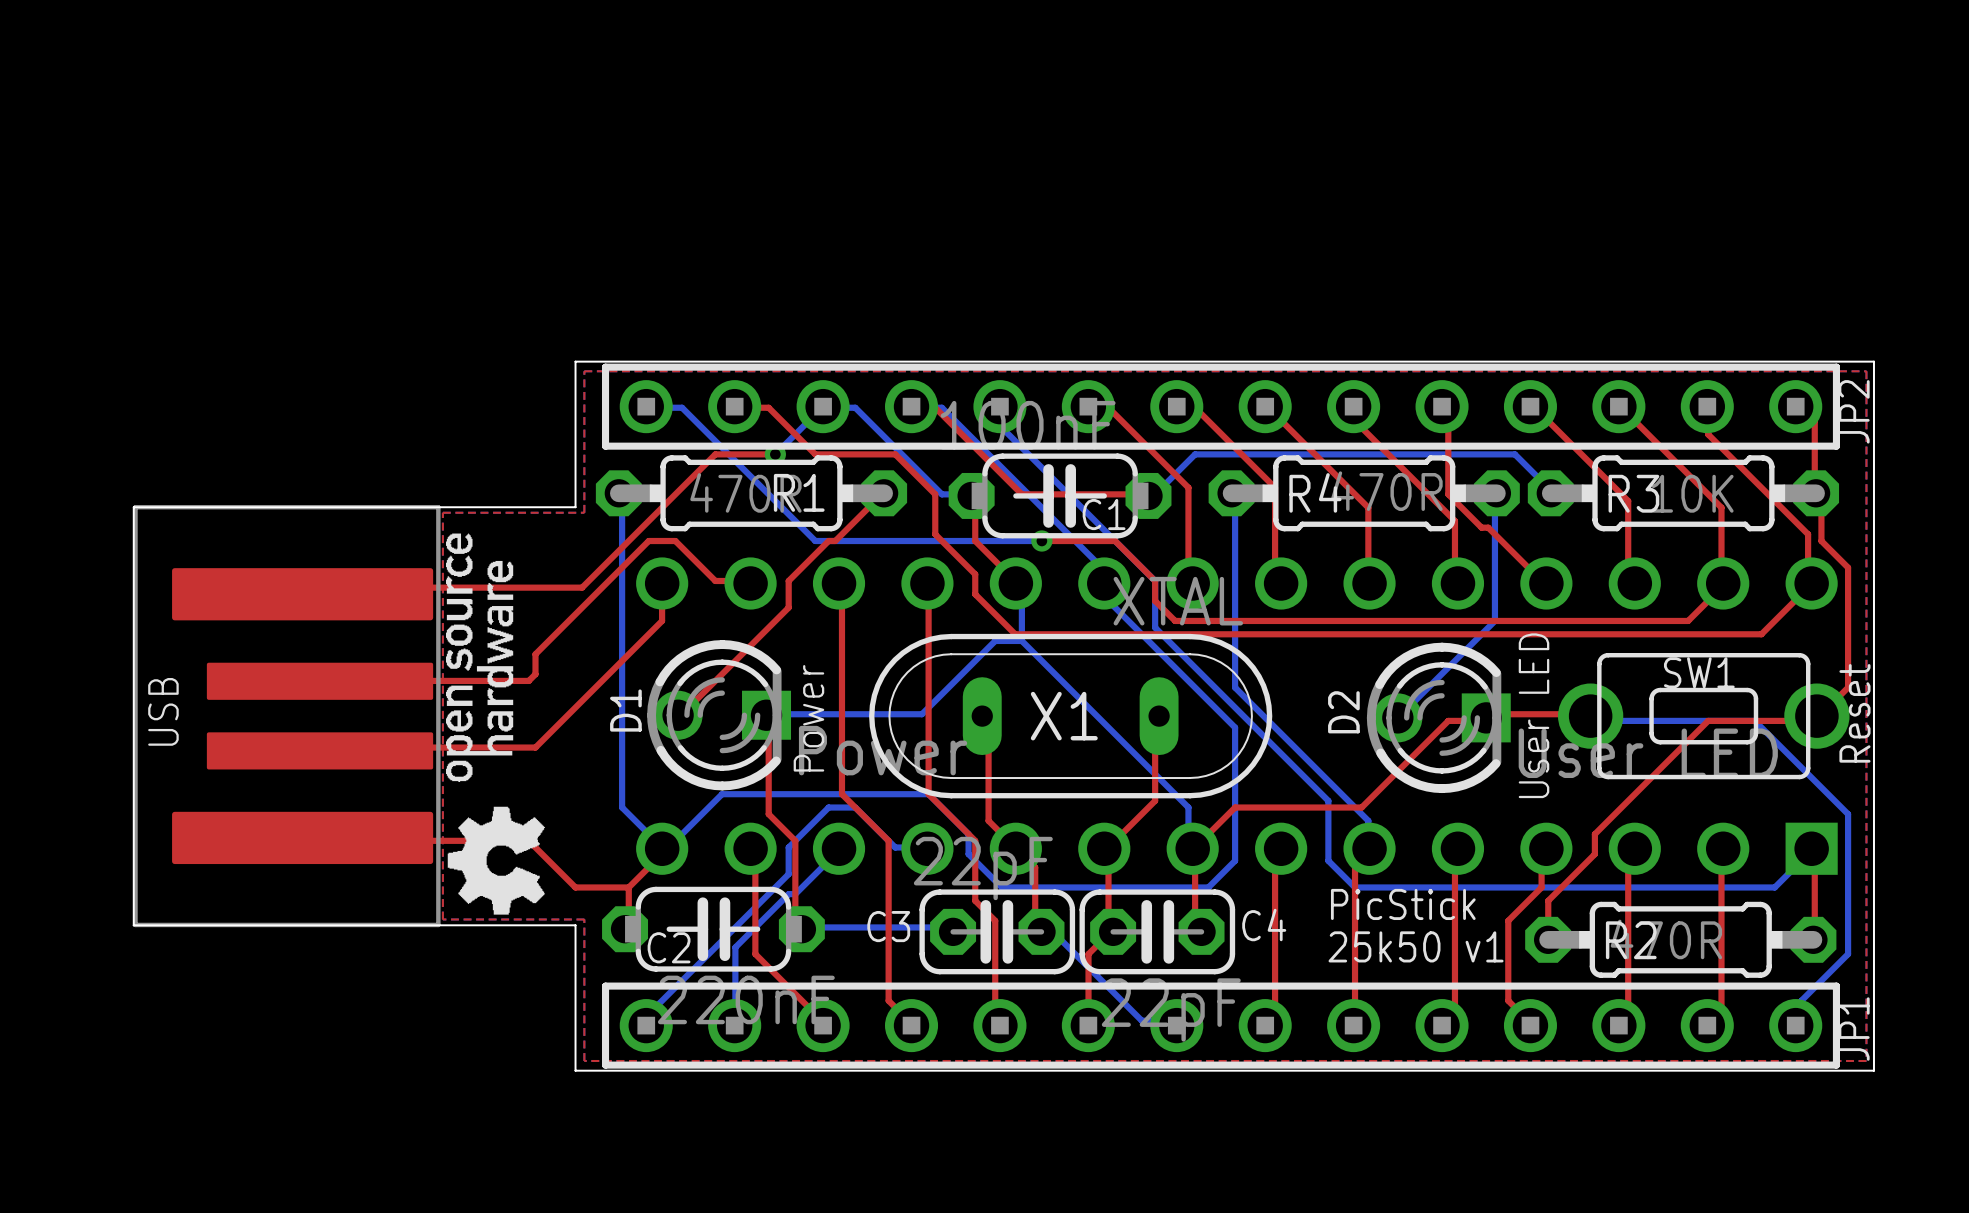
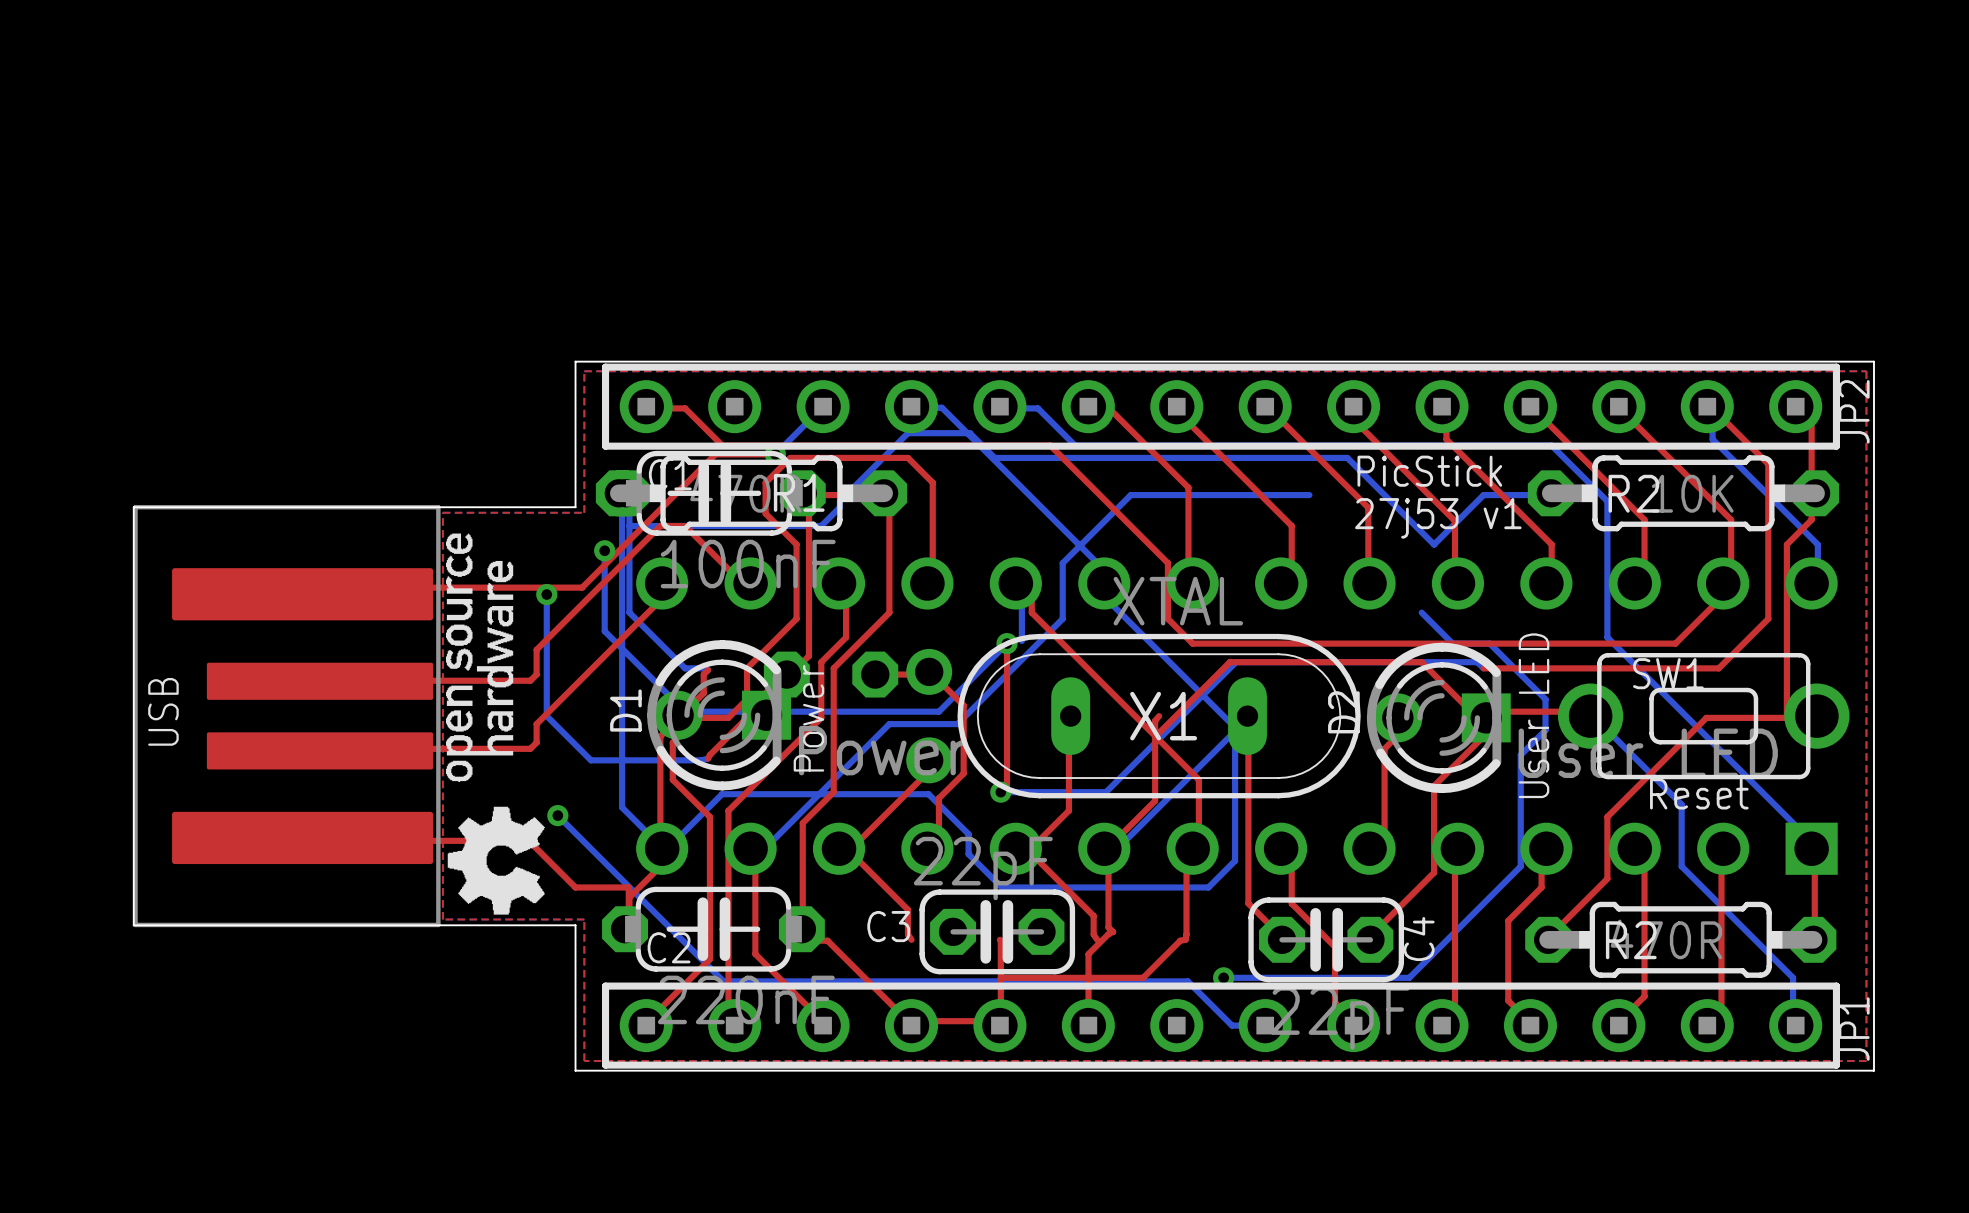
bottom track: (646, 406) (682, 407) (815, 541) (1041, 541) -> none
top track: (734, 406) (768, 407) (815, 454) (895, 454) (935, 494) (935, 534) (975, 574) (975, 594) (1015, 634) (1761, 634) (1811, 583) (1808, 580) (1808, 534) (1708, 434) (1707, 406) -> (1483, 668) (1718, 668) (1768, 618) (1768, 464) (1712, 408) (1707, 406)
bottom track: (823, 406) (855, 407) (941, 494) (971, 495) -> none
top track: (911, 406) (935, 407) (1021, 494) (1148, 494) (1148, 495) -> none
bottom track: (999, 406) (1001, 407) (1001, 427) (1155, 580) (1155, 627) (1328, 800) (1328, 860) (1355, 887) (1774, 887) (1811, 848) -> (999, 406) (1000, 408) (1037, 408) (1075, 445) (1551, 445) (1607, 501) (1607, 637) (1817, 847) (1822, 848)
top track: (1176, 406) (1195, 407) (1275, 487) (1275, 580) (1281, 583) -> (1176, 406) (1174, 408) (1291, 526) (1291, 583)
top track: (1442, 406) (1448, 407) (1448, 494) (1481, 527) (1488, 527) (1541, 580) (1546, 583) -> (1442, 406) (1446, 408) (1446, 439) (1551, 544) (1551, 581) (1556, 583)
top track: (1530, 406) (1534, 407) (1628, 501) (1628, 580) (1634, 583) -> (1530, 406) (1644, 519) (1645, 583)
top track: (1618, 406) (1721, 507) (1721, 580) (1723, 583) (1721, 587) (1688, 620) (1175, 620) (1155, 600) (1155, 580) (1115, 541) (1041, 541) -> (1618, 406) (1731, 519) (1731, 581) (1733, 583) (1675, 643) (1192, 643) (1167, 618) (1167, 563) (1050, 445) (722, 445) (685, 408) (648, 408) (646, 406)
bottom track: none -> (1707, 406) (1712, 408) (1712, 439) (1817, 544) (1817, 581) (1822, 583)
top track: (1795, 406) (1801, 407) (1814, 421) (1814, 487) (1816, 493) (1821, 494) (1821, 541) (1848, 567) (1848, 687) (1821, 714) (1816, 716) (1814, 720) (1708, 720) (1594, 834) (1594, 854) (1548, 900) (1548, 939) -> (1795, 406) (1811, 420) (1811, 488) (1816, 493) (1811, 495) (1811, 519) (1786, 544) (1786, 717) (1816, 716) (1811, 717) (1706, 717) (1607, 816) (1607, 878) (1548, 939)
bottom track: none -> (625, 493) (629, 495) (629, 612) (685, 668) (708, 670)
top track: (884, 493) (835, 541) (828, 541) (788, 580) (788, 607) (682, 714) (678, 715) -> none
bottom track: (1231, 493) (1235, 494) (1235, 687) (1368, 820) (1369, 848) -> none
R4: 470R (1364, 493) -> none
bottom track: (1496, 493) (1494, 494) (1494, 620) (1397, 717) -> none
bottom track: (1550, 493) (1548, 487) (1514, 454) (1195, 454) (1155, 494) (1148, 495) -> (1550, 493) (1545, 495) (1483, 495) (1434, 544) (1347, 457) (994, 457) (969, 433) (907, 433) (839, 501) (839, 507) (821, 526) (629, 526)
R3 name: R3 (1633, 493) -> R2 (1633, 493)
top track: (971, 495) (975, 501) (975, 541) (1015, 583) -> none
C1 rotation: 0° (1060, 495) -> 180° (714, 493)
C1 position: (1060, 495) -> (714, 493)
bottom track: none -> (1309, 495) (1130, 495) (1062, 563) (1062, 618) (957, 724) (889, 724) (765, 847) (761, 848)
text: none -> 27j53 v1 (1438, 518)
via position: (1041, 541) -> (1007, 643)
bottom track: none -> (604, 550) (604, 631) (672, 699) (672, 705) (678, 711) (938, 711) (1007, 643)
via: none -> (604, 550)
top track: (662, 583) (662, 620) (535, 747) (322, 747) (320, 750) -> (672, 583) (672, 587) (536, 724) (536, 742) (530, 748) (326, 748) (320, 750)
top track: (750, 583) (748, 580) (715, 580) (675, 541) (648, 541) (535, 654) (535, 674) (528, 680) (320, 681) -> (761, 583) (759, 581) (740, 581) (685, 526) (660, 526) (536, 649) (536, 674) (530, 680) (320, 681)
top track: (839, 583) (841, 587) (841, 794) (888, 840) (888, 1000) (911, 1025) -> none
top track: none -> (849, 583) (846, 587) (846, 637) (821, 662) (821, 717) (728, 810) (728, 1014) (734, 1021) (734, 1025)
top track: (927, 583) (928, 794) (975, 840) (975, 900) (995, 920) (995, 1020) (999, 1025) -> none
top track: none -> (938, 583) (932, 581) (932, 482) (907, 457) (790, 457) (765, 482) (765, 513) (796, 544) (796, 618) (747, 668) (747, 699) (728, 717) (697, 717) (672, 742) (672, 779) (709, 816) (709, 959) (648, 1021) (646, 1025)
top track: none -> (1026, 583) (1031, 587) (1031, 612) (1198, 779) (1198, 847) (1203, 848) (1186, 866) (1185, 939) (1180, 940) (1143, 977) (1000, 977)
bottom track: none -> (546, 594) (546, 716) (590, 760) (701, 760) (708, 758)
via: none -> (546, 594)
bottom track: none -> (1421, 612) (1452, 643) (1489, 643) (1545, 699) (1545, 730) (1520, 755) (1520, 866) (1409, 977) (1223, 977)
top track: none -> (1007, 643) (1007, 785) (1000, 792)
bottom track: none -> (1483, 668) (1477, 662) (1236, 662) (1106, 792) (1000, 792)
top track: none -> (708, 670) (703, 674) (703, 693) (660, 736) (660, 835) (672, 847) (672, 854) (629, 897) (629, 934) (625, 938)
text position: SW1 (1699, 672) -> SW1 (1668, 673)
part: none -> (831, 674)
top track: none -> (875, 674) (926, 674) (929, 671) (963, 705) (963, 773) (938, 798) (938, 848)
text rotation: 0° (1854, 713) -> 90° clockwise (1699, 793)
text position: Reset (1854, 713) -> Reset (1699, 793)
top track: (766, 715) (768, 720) (768, 814) (795, 840) (795, 927) (801, 929) -> none
bottom track: (766, 715) (921, 714) (995, 640) (1021, 640) (1188, 807) (1188, 847) (1192, 848) -> none
part: none -> (929, 716)
top track: (982, 716) (988, 720) (988, 820) (1035, 867) (1035, 927) (1041, 931) -> none
X1 name position: X1 (1064, 716) -> X1 (1163, 716)
top track: none -> (1070, 716) (1068, 717) (1068, 810) (1031, 847) (1026, 848) (1093, 915) (1093, 934) (1097, 939)
X1 position: (1070, 716) -> (1159, 716)
top track: none -> (1247, 716) (1248, 903) (1279, 934) (1282, 939)
bottom track: none -> (1247, 716) (1248, 717) (1118, 847) (1114, 848)
top track: none -> (1415, 716) (1384, 748) (1384, 847) (1380, 848)
top track: (1590, 716) (1588, 714) (1488, 714) (1481, 720) (1448, 720) (1361, 807) (1235, 807) (1192, 848) (1195, 854) (1195, 927) (1201, 931) -> (1590, 716) (1588, 711) (1508, 711) (1434, 785) (1434, 872) (1372, 934) (1370, 939)
bottom track: (1590, 716) (1594, 720) (1754, 720) (1848, 814) (1848, 954) (1801, 1000) (1801, 1020) (1795, 1025) -> (1590, 716) (1595, 717) (1681, 804) (1681, 866) (1793, 977) (1793, 1021) (1795, 1025)
top track: none -> (1489, 730) (1421, 662) (1229, 662) (1155, 736)
drawing: none -> [512, 751, 514, 756]
top track: none -> (708, 758) (759, 705) (759, 699) (784, 674) (790, 674) (808, 655) (808, 495) (802, 493) (802, 495) (877, 495) (893, 510) (889, 513) (889, 612) (833, 668) (833, 792) (802, 823) (801, 938) (802, 940) (827, 940) (911, 1025) (914, 1021) (994, 1021) (999, 1025) (999, 939)
top track: none -> (929, 760) (926, 761) (926, 773) (849, 848) (852, 854) (907, 909) (907, 934) (911, 939)
via: none -> (1000, 792)
bottom track: none -> (557, 815) (723, 981) (1187, 981) (1232, 1025) (1265, 1025)
via: none -> (557, 815)
top track: (662, 848) (662, 854) (628, 887) -> none
bottom track: (839, 848) (795, 894) (788, 894) (735, 947) (734, 1025) -> none
bottom track: (927, 848) (895, 847) (855, 807) (828, 807) (788, 847) (788, 874) (642, 1020) (646, 1025) -> none
top track: (1281, 848) (1275, 854) (1275, 1014) (1265, 1025) -> none
top track: (1369, 848) (1368, 854) (1355, 867) (1353, 1025) -> (1291, 848) (1291, 903) (1335, 946) (1335, 1002) (1353, 1021) (1353, 1025)
top track: (1634, 848) (1628, 854) (1628, 1014) (1618, 1025) -> (1645, 848) (1644, 996) (1619, 1021) (1618, 1025)
text position: PicStick (1403, 904) -> PicStick (1429, 471)
C4 name rotation: 0° (1264, 925) -> 90° counterclockwise (1418, 939)
bottom track: (801, 929) (802, 927) (948, 927) (953, 931) -> none
bottom track: (1041, 931) (1041, 934) (1055, 934) (1141, 1020) (1175, 1020) (1176, 1025) -> none
C4 position: (1157, 931) -> (1326, 939)
text: 25k50 v1 (1416, 946) -> none
via: none -> (1223, 977)

